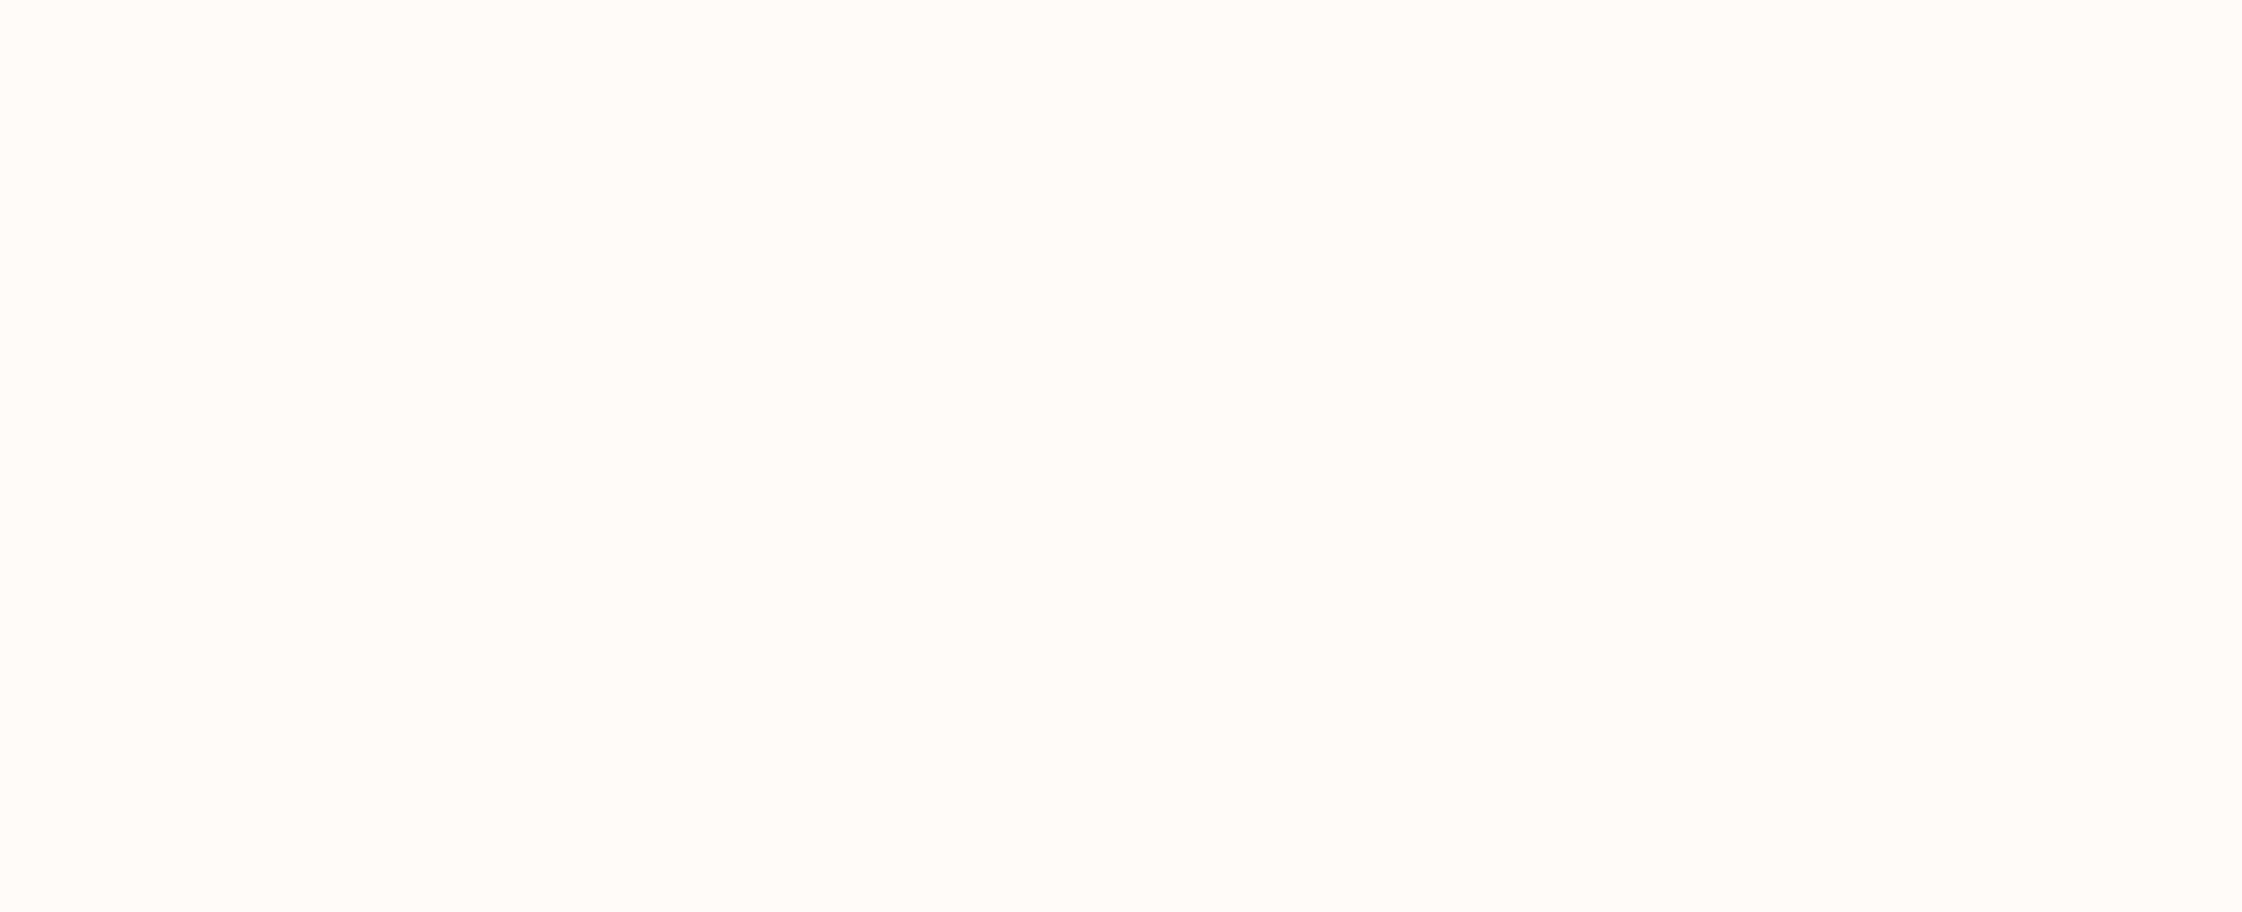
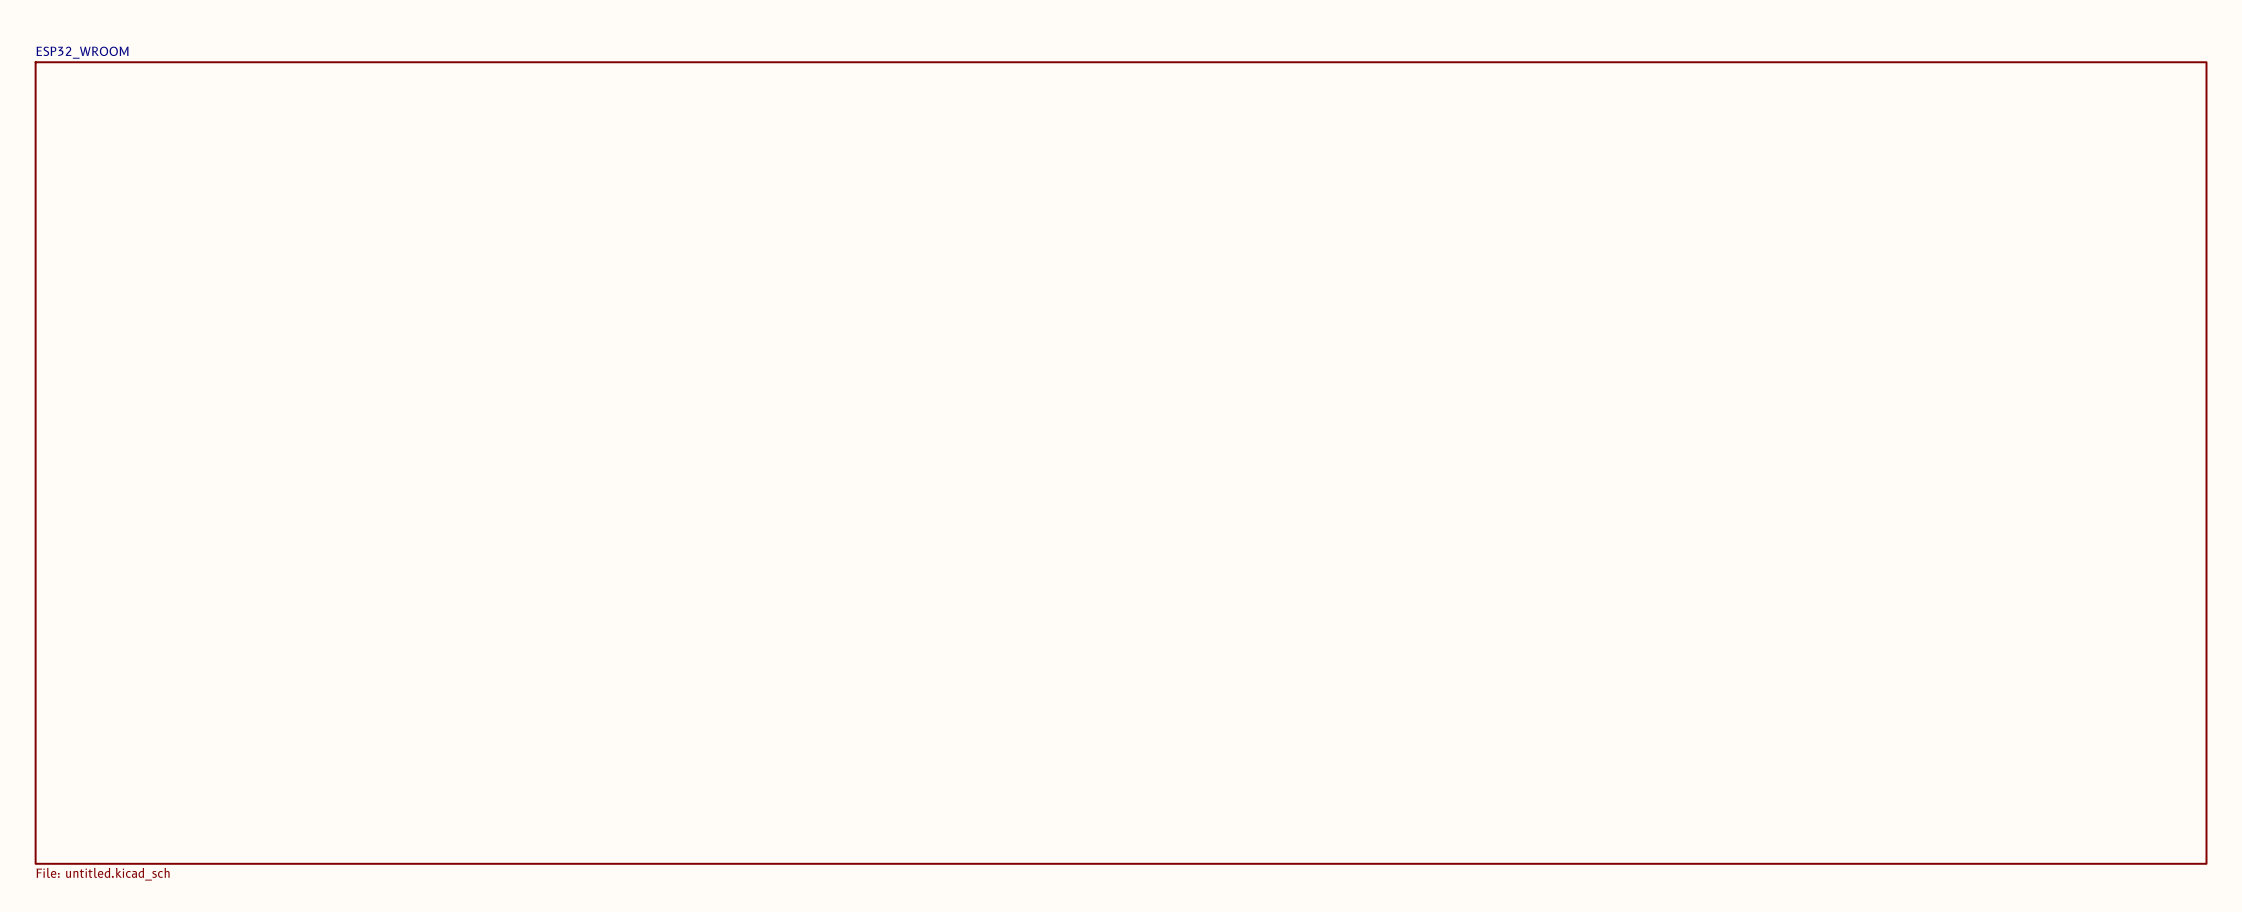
sheet ESP32_WROOM: none -> File: untitled.kicad_sch (1121, 463)

